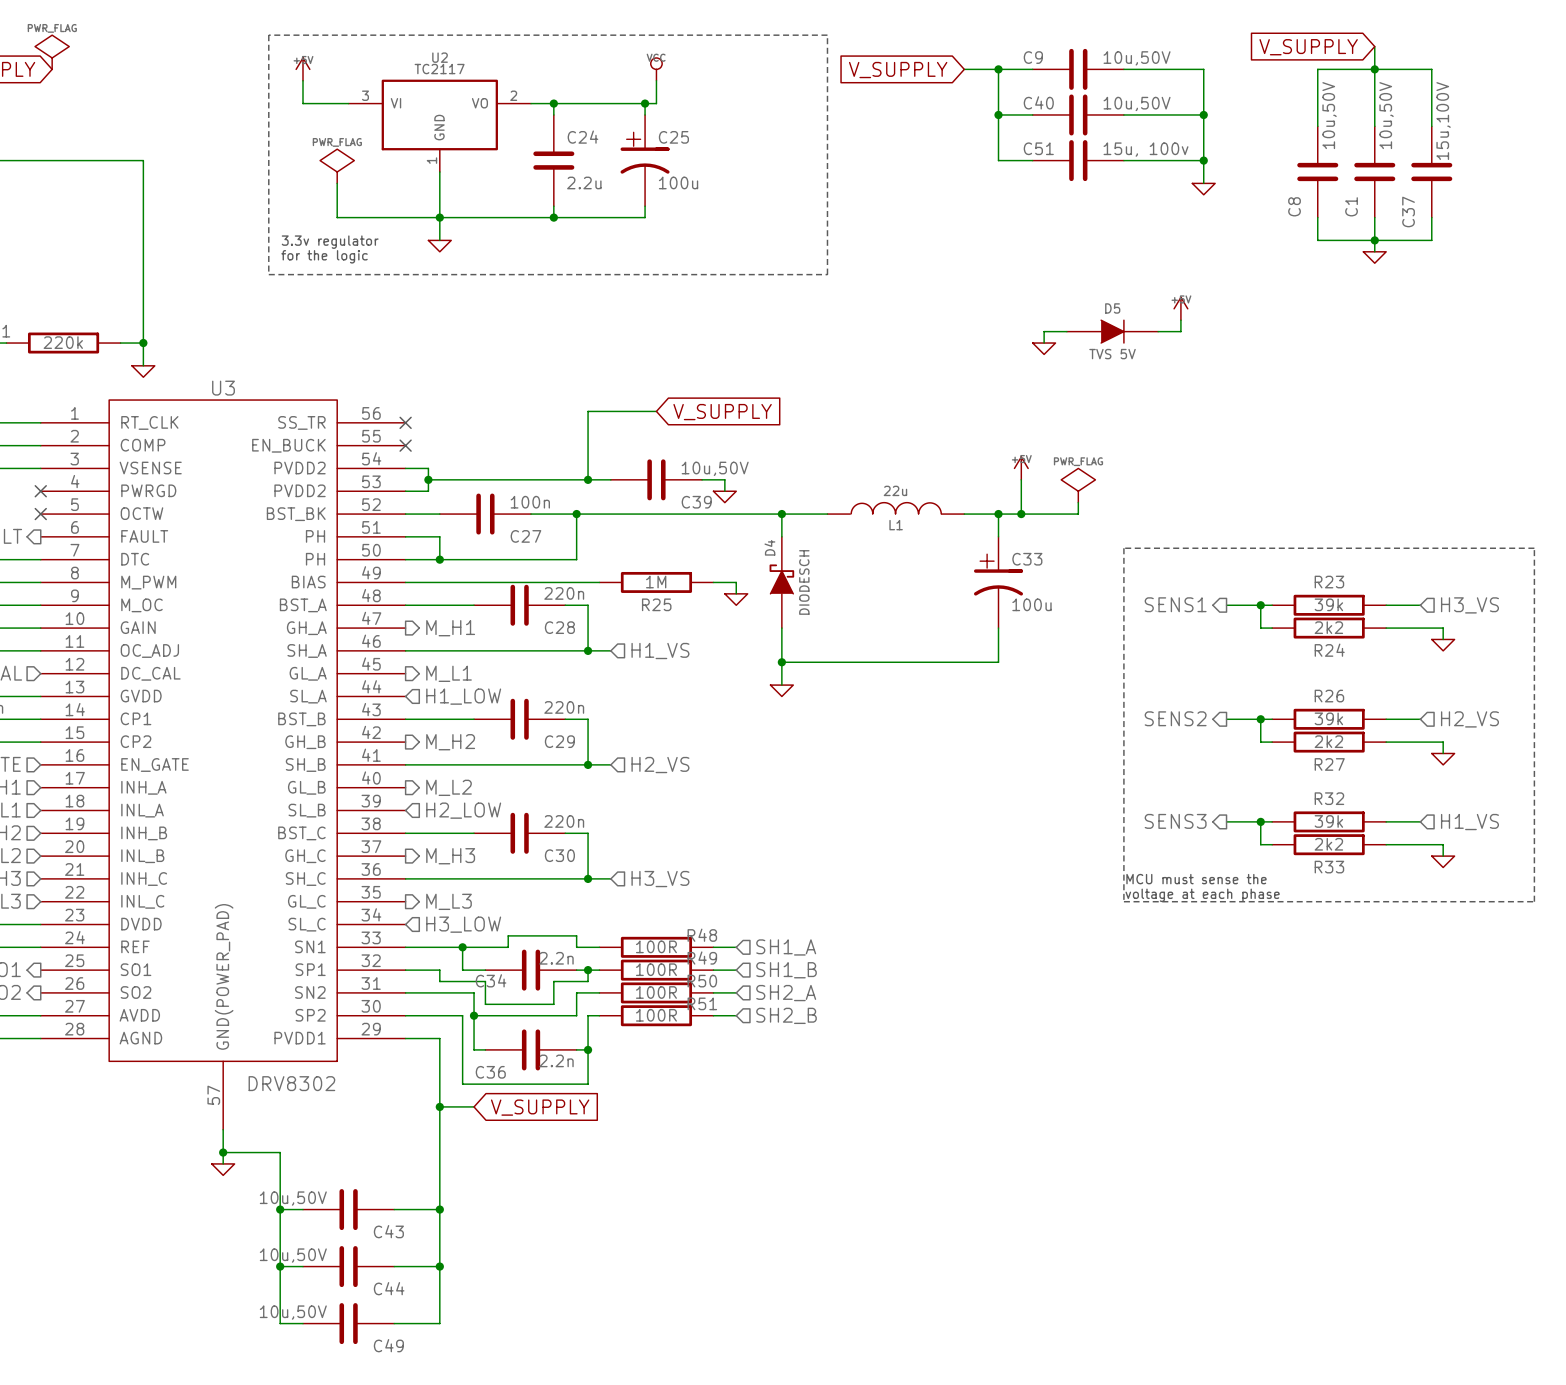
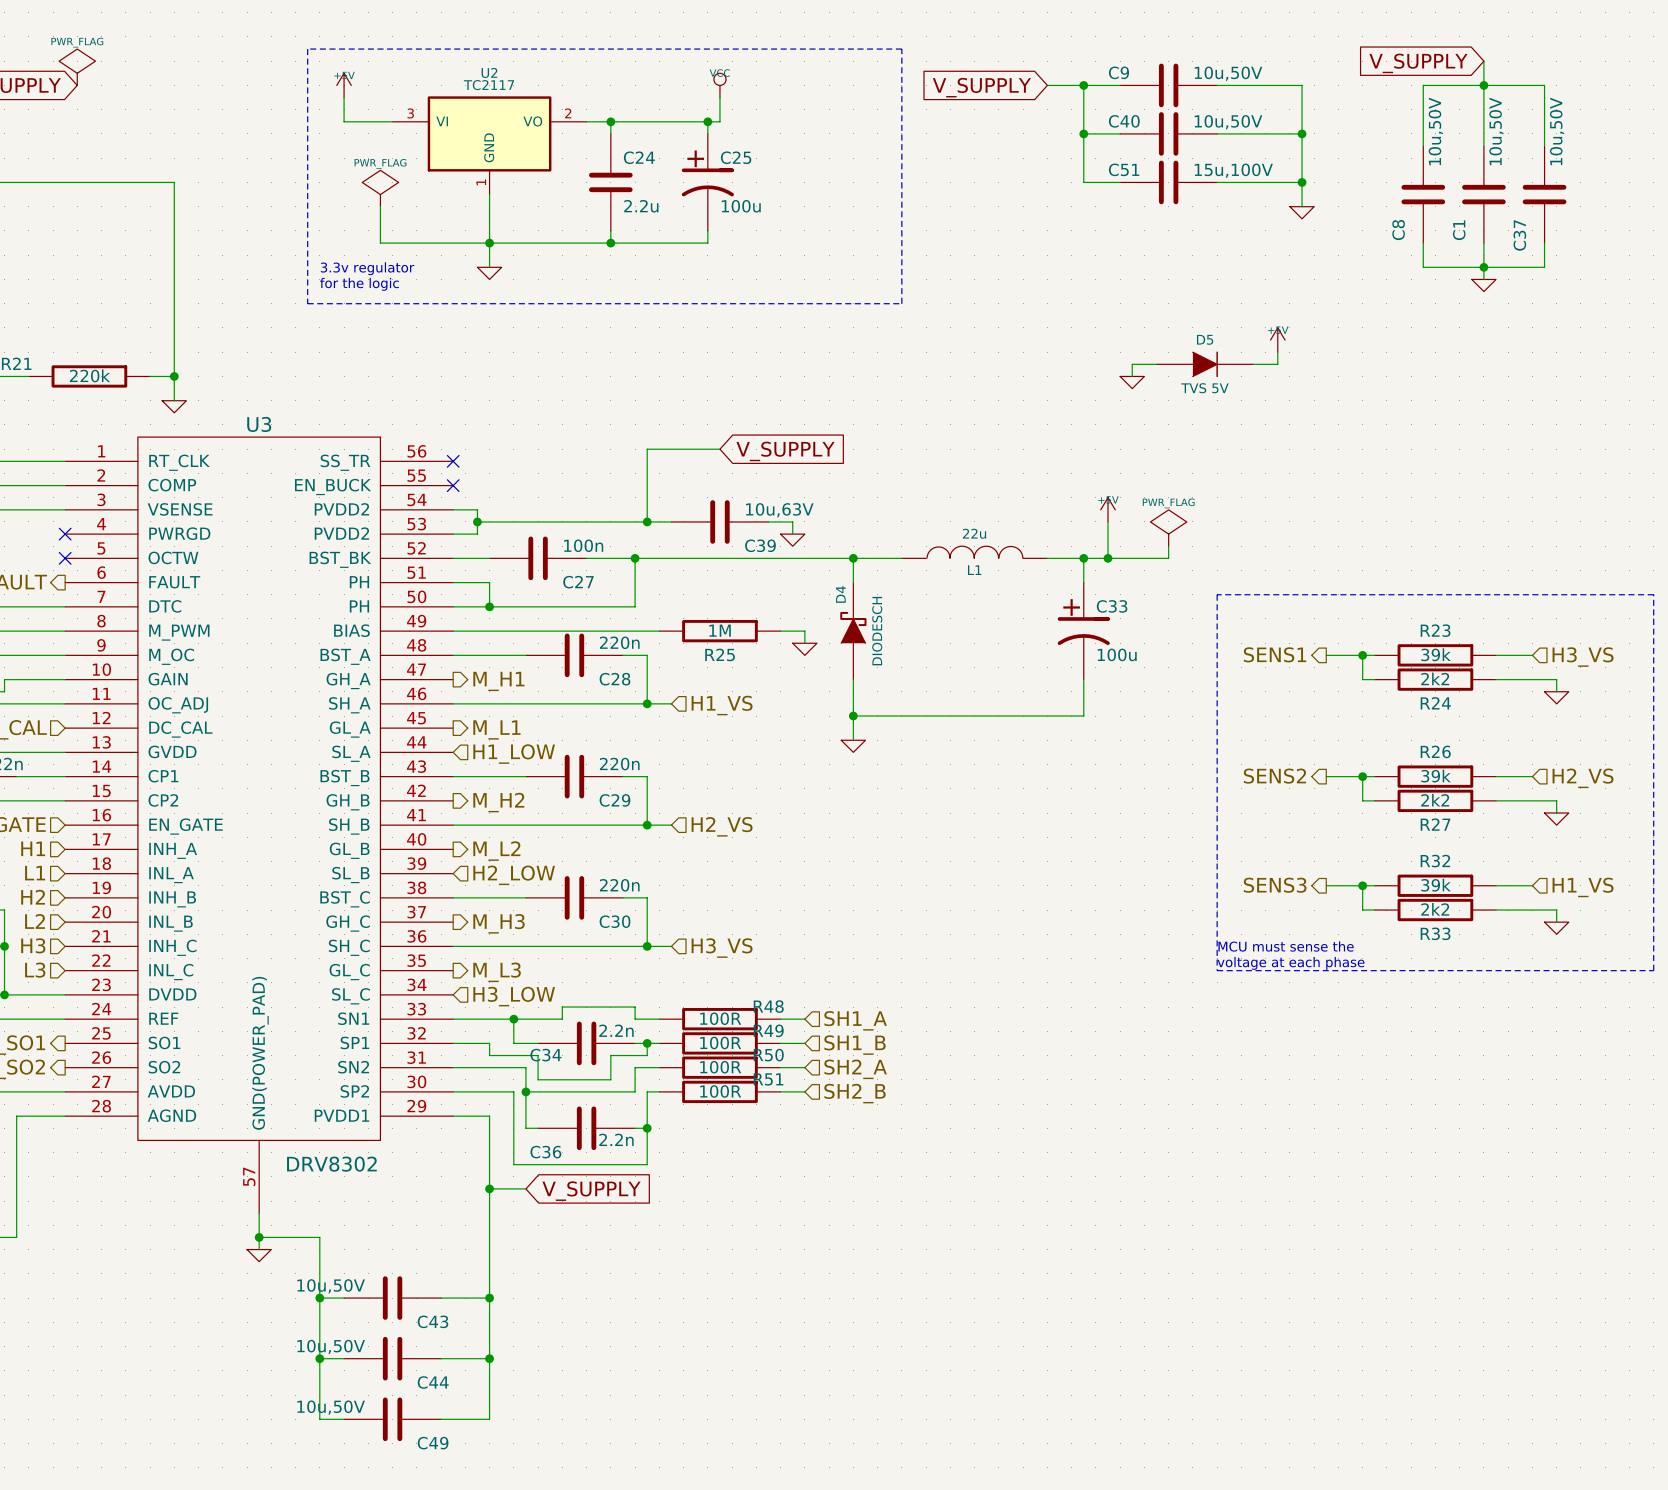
C37 value: 15u,100V (1443, 121) -> 10u,50V (1557, 131)
C51 value: 15u, 100v (1146, 149) -> 15u,100V (1233, 170)
C39 value: 10u,50V (715, 468) -> 10u,63V (779, 510)

